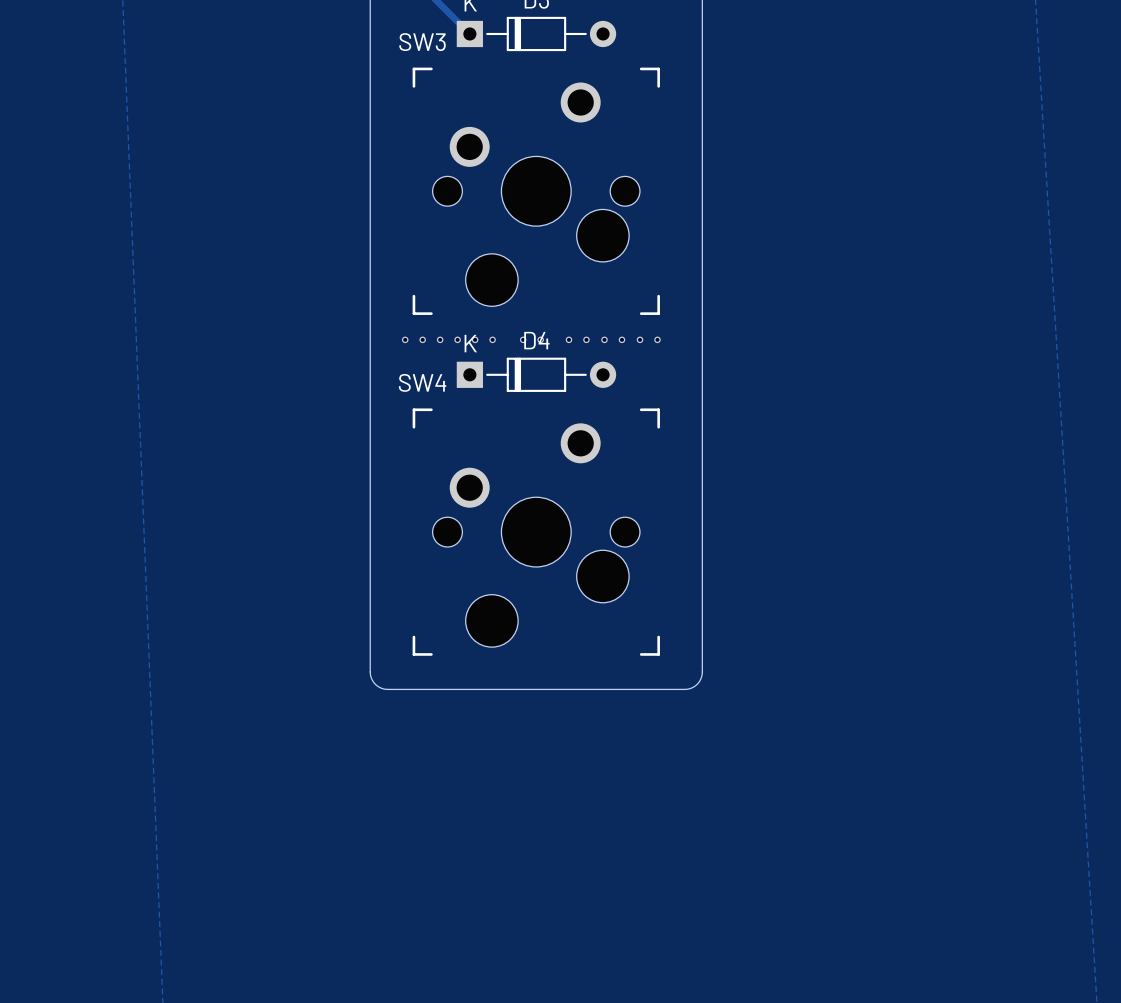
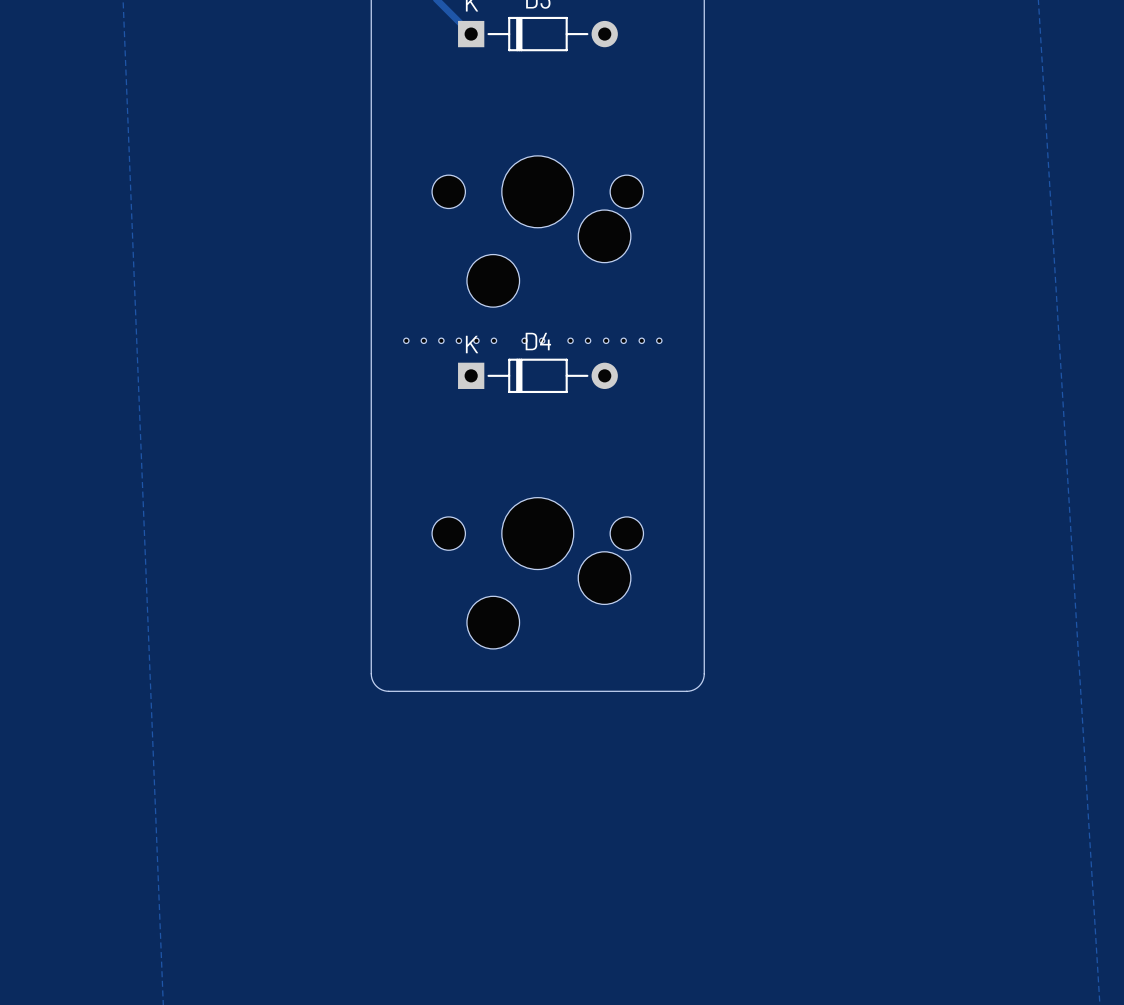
SW3: (536, 191) -> none
part: none -> (537, 231)
SW4: (536, 532) -> none
part: none -> (537, 573)

